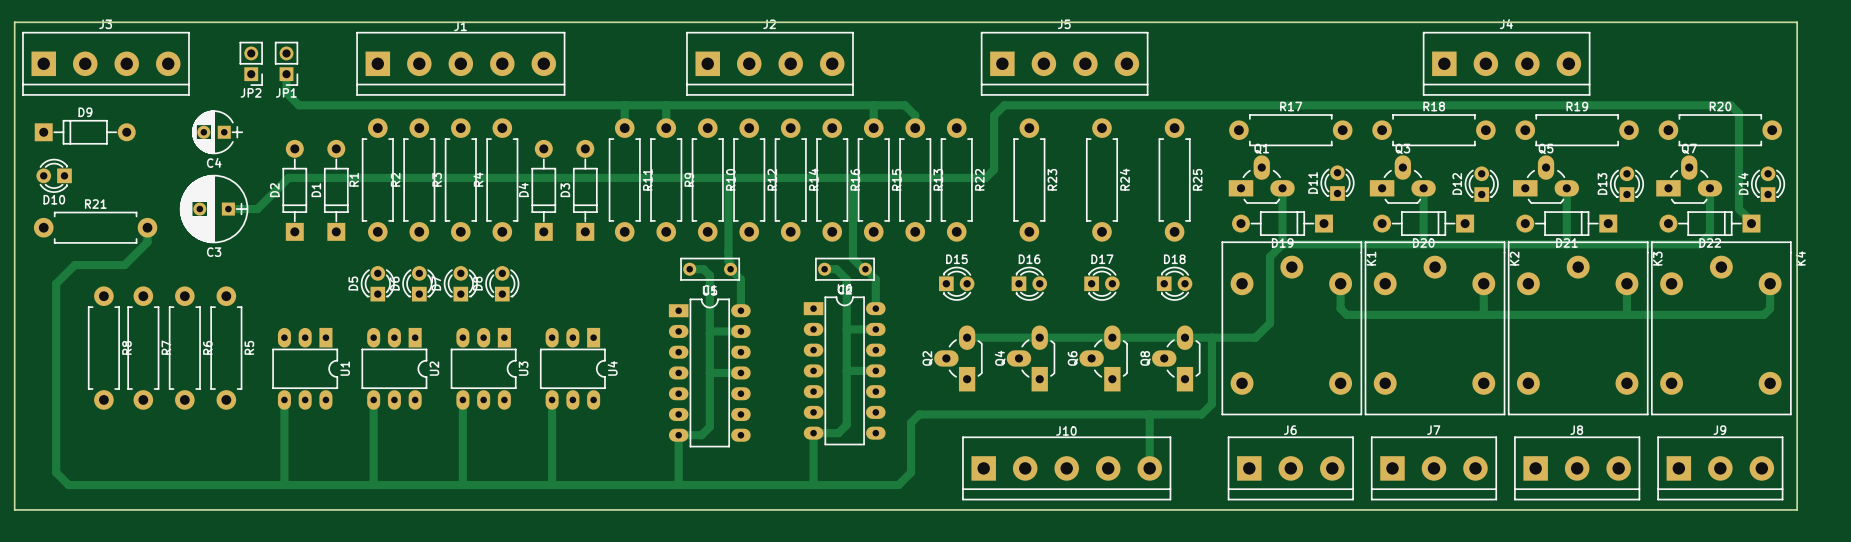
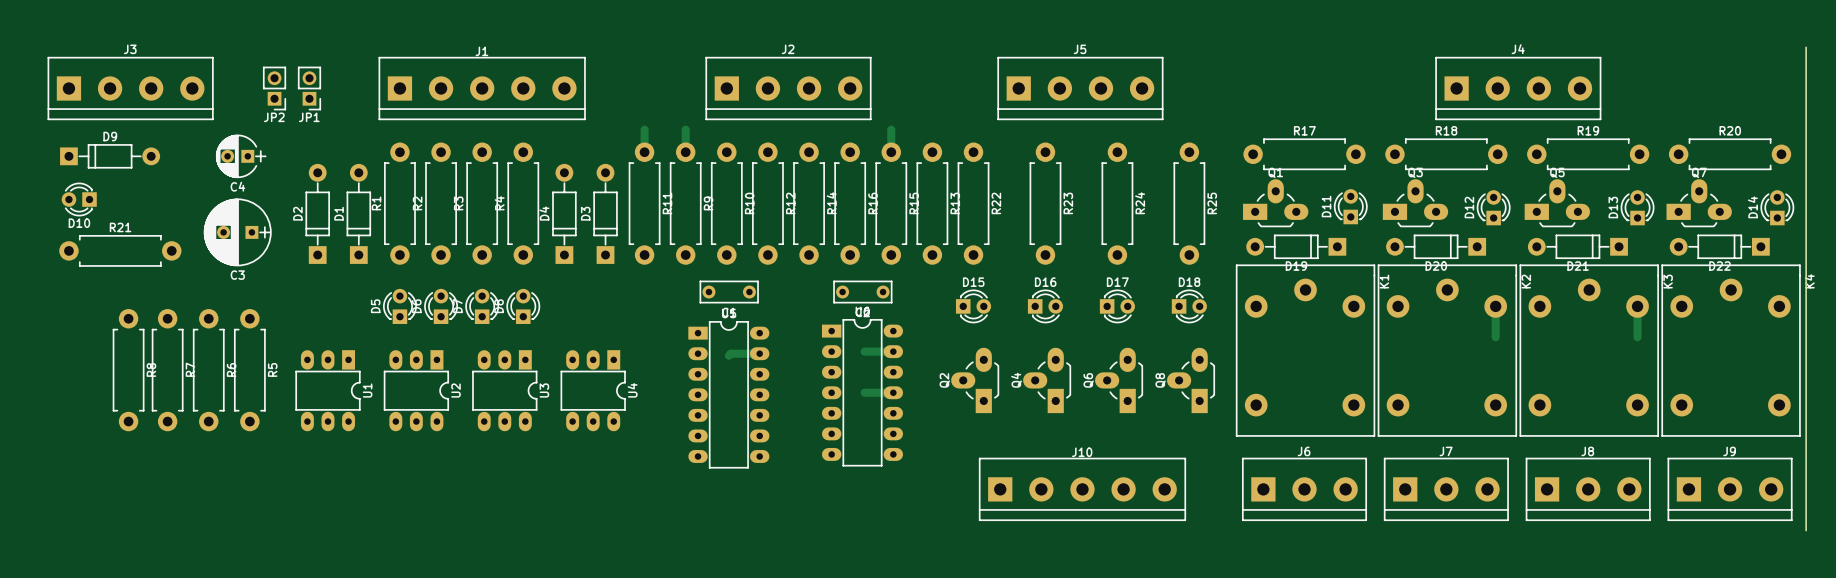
board edge: (1797, 22) (14, 22) (14, 509) (1797, 509) -> none
track: (286, 74) (286, 92) (298, 105) (904, 105) (915, 115) (915, 128) -> none
track: (728, 177) (728, 260) (730, 262) -> none
track: (852, 177) (852, 258) (875, 279) (875, 308) -> none
track: (1282, 188) (1282, 244) -> none
track: (1423, 188) (1423, 244) -> none
track: (1566, 188) (1566, 244) -> none
track: (1709, 188) (1709, 233) (1699, 244) (1282, 244) -> none
track: (228, 209) (257, 209) (288, 177) (985, 177) (994, 169) (994, 115) (1004, 105) (1730, 105) (1739, 113) (1739, 209) (1751, 223) -> none
track: (147, 227) (147, 242) (124, 265) (74, 265) (56, 283) (56, 472) (68, 485) (898, 485) (911, 472) (911, 422) (919, 414) (1201, 414) (1211, 404) (1211, 337) -> none
track: (1282, 244) (1270, 256) (1270, 323) (1255, 337) (967, 337) -> none
track: (689, 269) (703, 269) (709, 275) (709, 426) (701, 435) (678, 435) (678, 485) -> none
track: (730, 269) (740, 279) (740, 310) -> none
track: (824, 269) (836, 269) (846, 279) (846, 424) (838, 433) (813, 433) (813, 482) (811, 485) -> none
track: (1340, 283) (1340, 308) (1346, 314) (1763, 314) (1770, 308) (1770, 283) -> none
track: (709, 372) (740, 372) -> none
track: (284, 399) (284, 485) -> none
track: (373, 399) (373, 485) -> none
track: (462, 399) (462, 485) -> none
track: (552, 399) (552, 485) -> none
track: (1149, 414) (1149, 468) -> none

